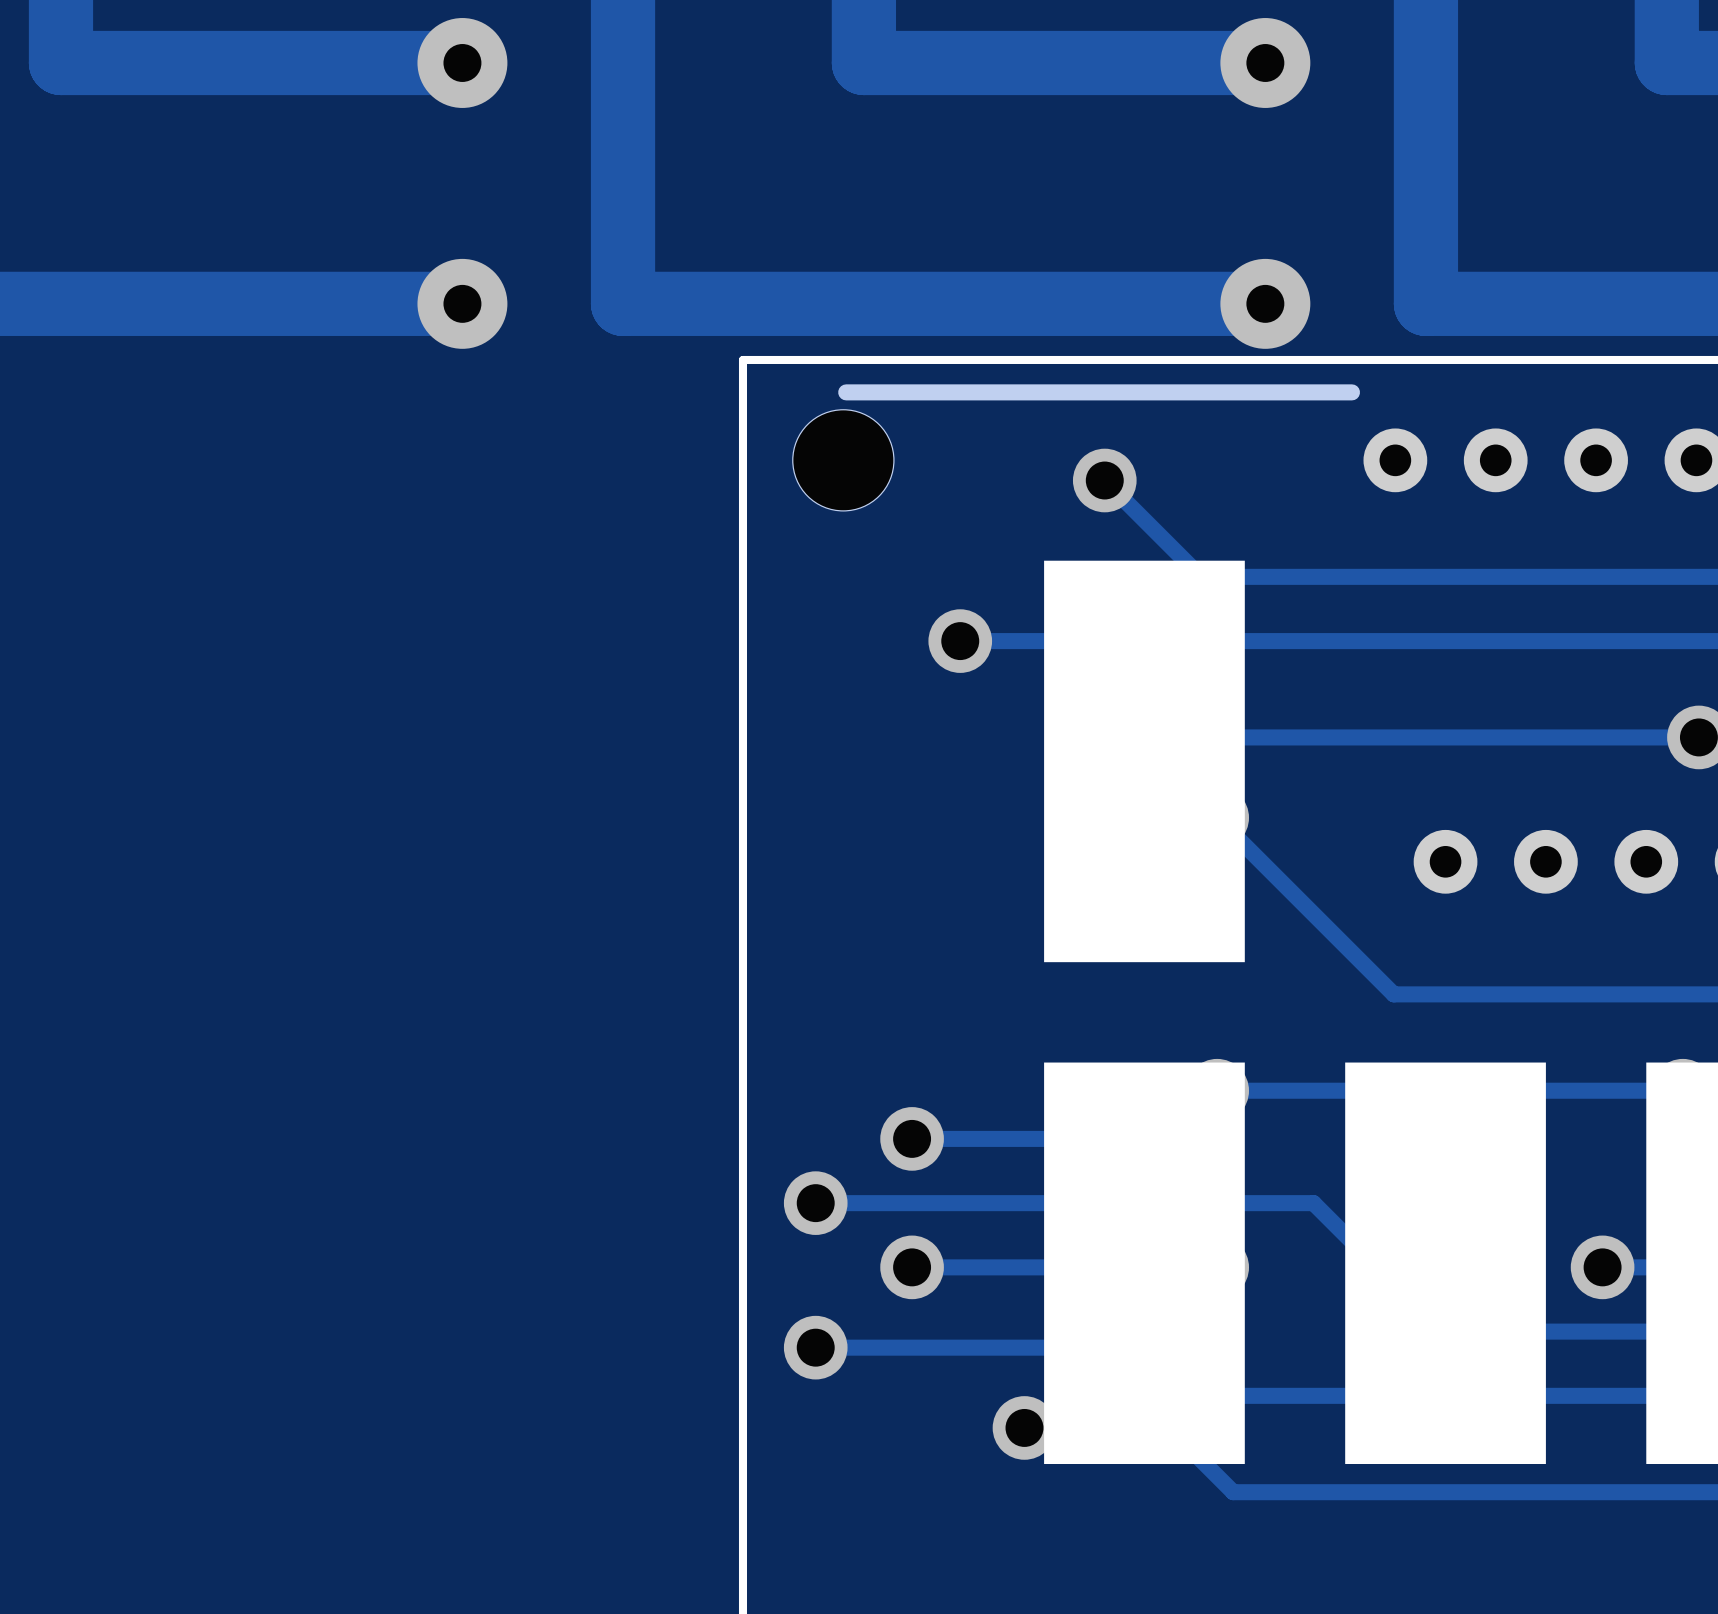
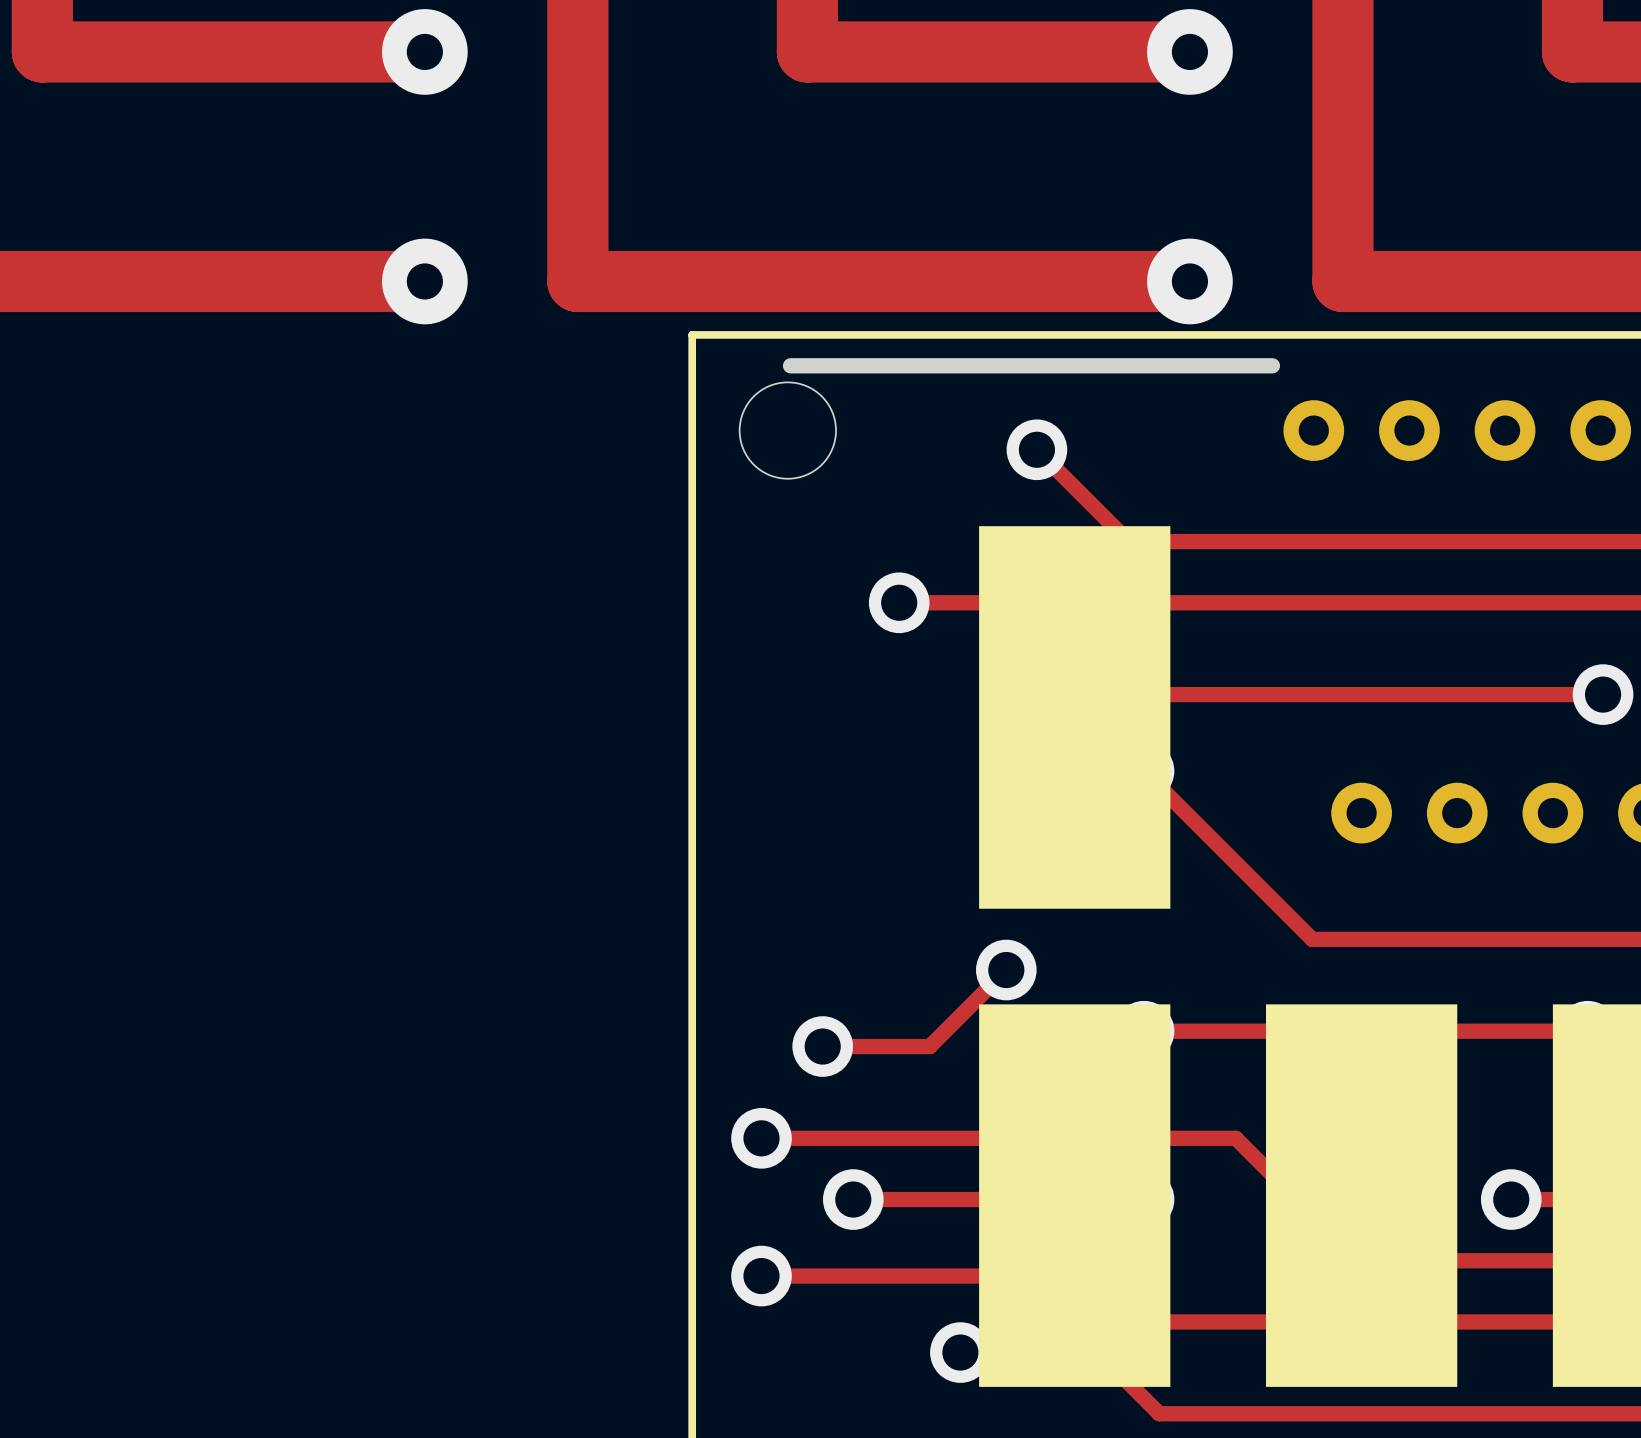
track: none -> (1006, 970) (929, 1046) (822, 1046)
via: none -> (1006, 970)
track: (912, 1138) (1104, 1138) -> none
via position: (912, 1138) -> (822, 1046)

